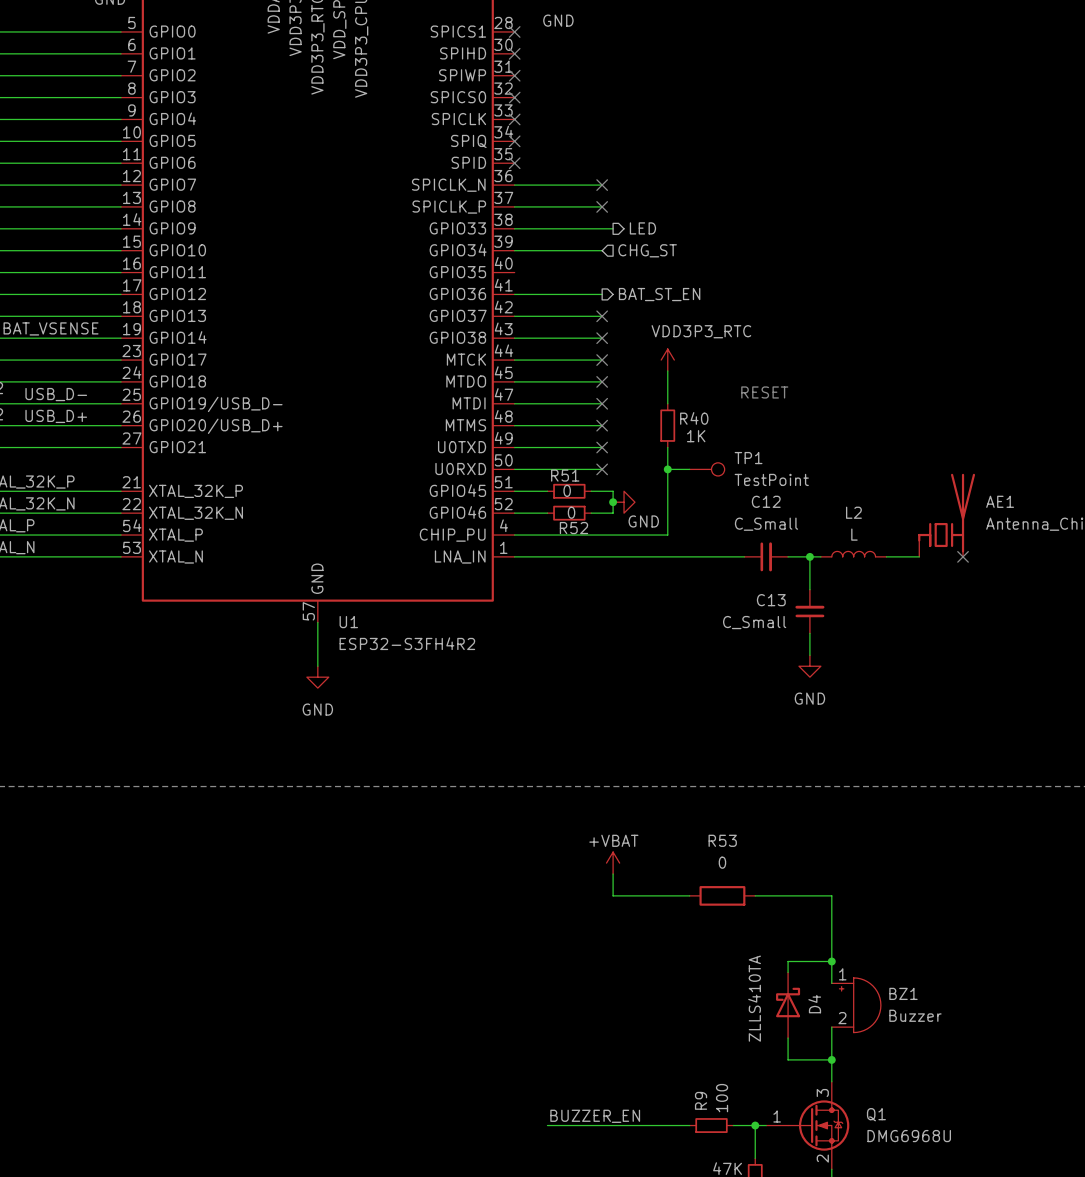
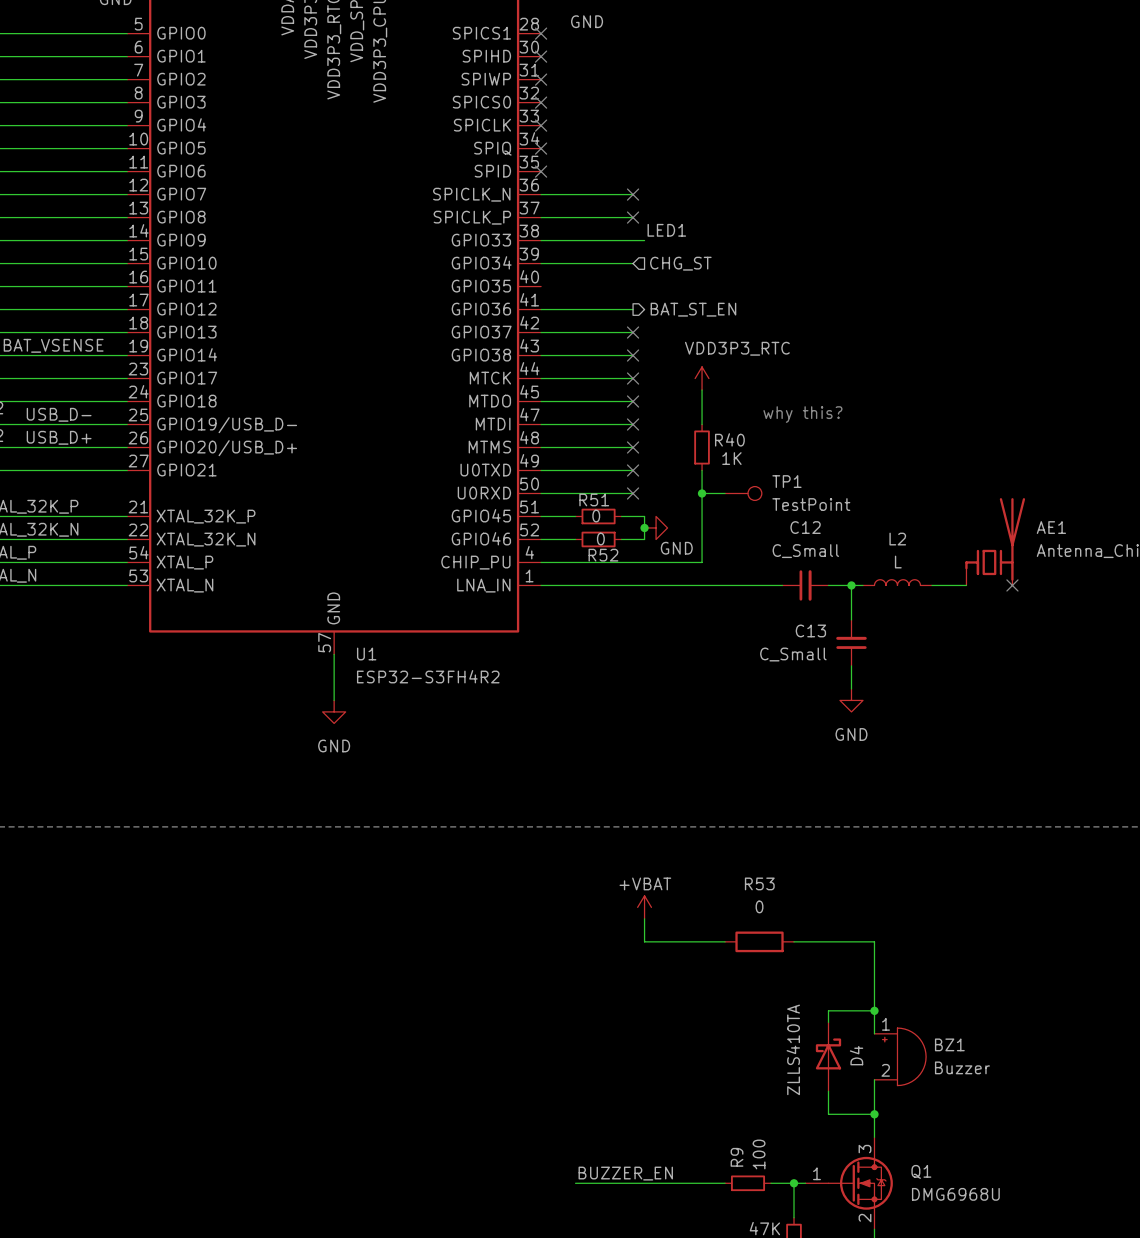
label: none -> LED1 (666, 230)
hierarchical label: LED (642, 228) -> none
text: RESET (764, 392) -> why this? (802, 414)

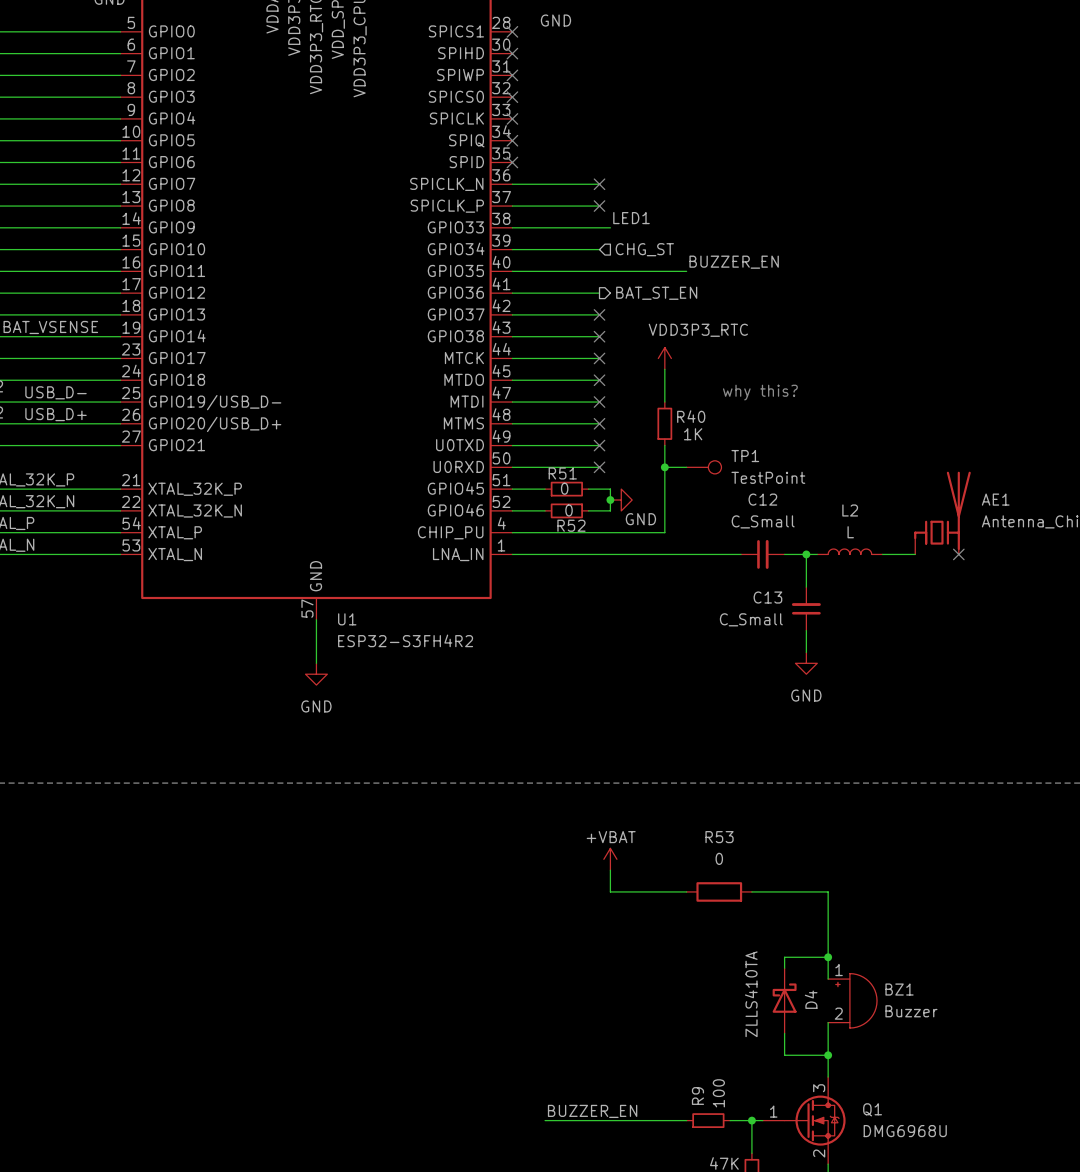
label: none -> BUZZER_EN (734, 262)
wire: none -> (512, 271) (686, 271)

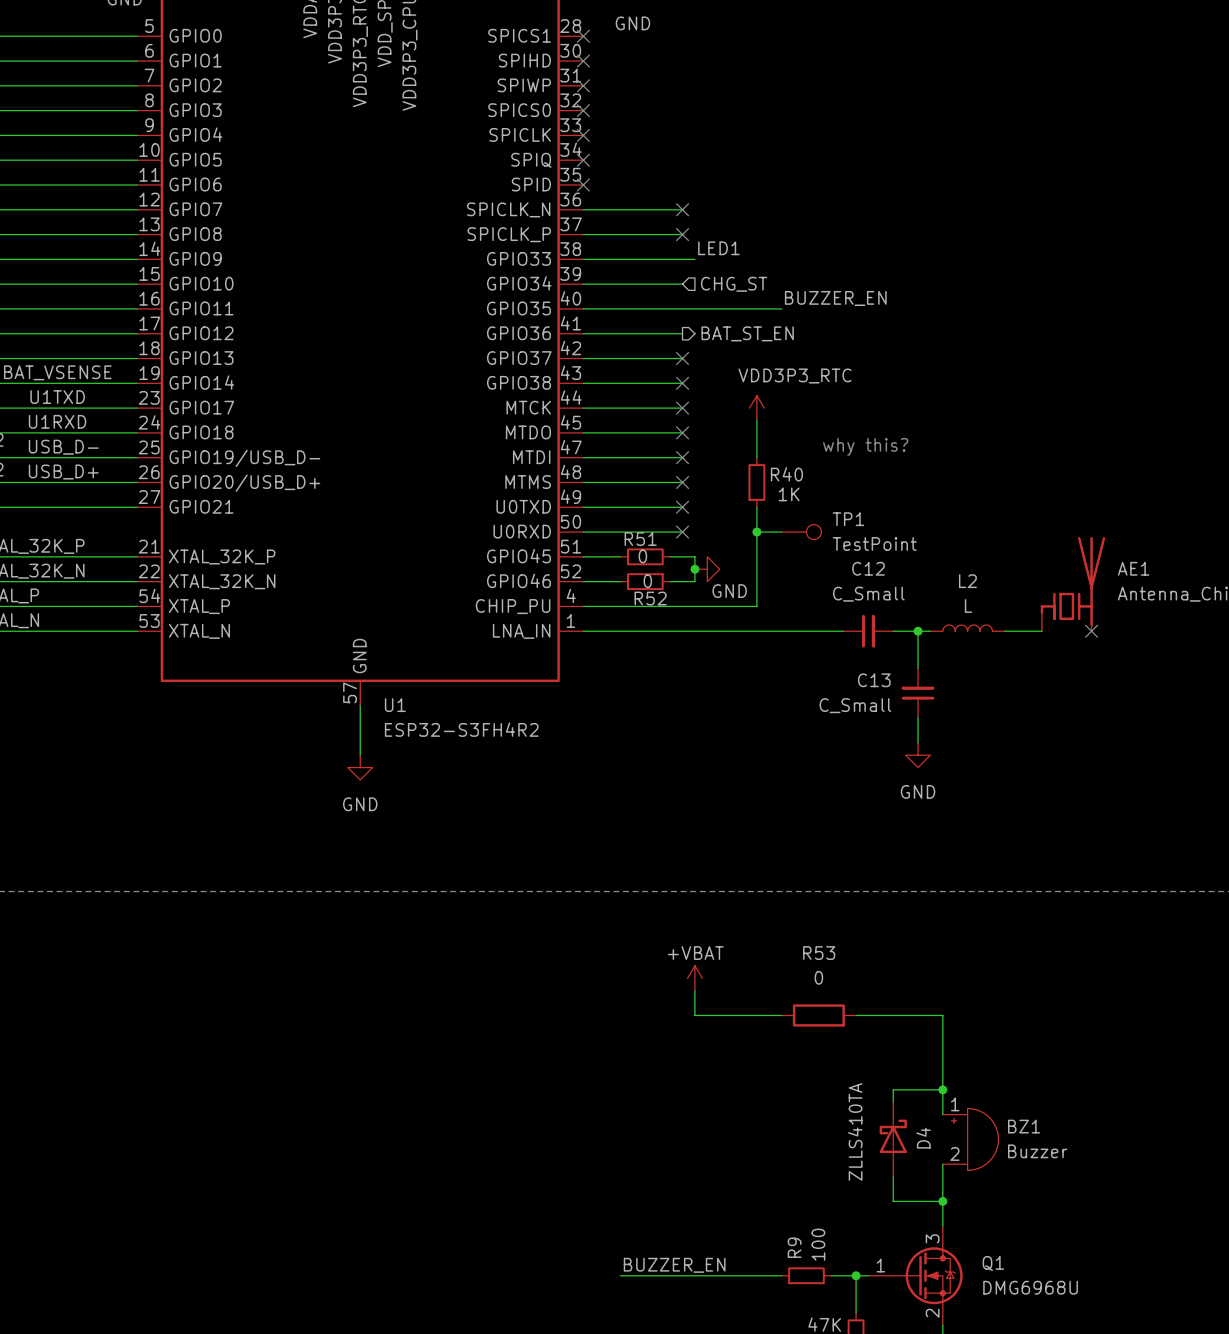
label: none -> U1TXD (57, 397)
label: none -> U1RXD (57, 421)

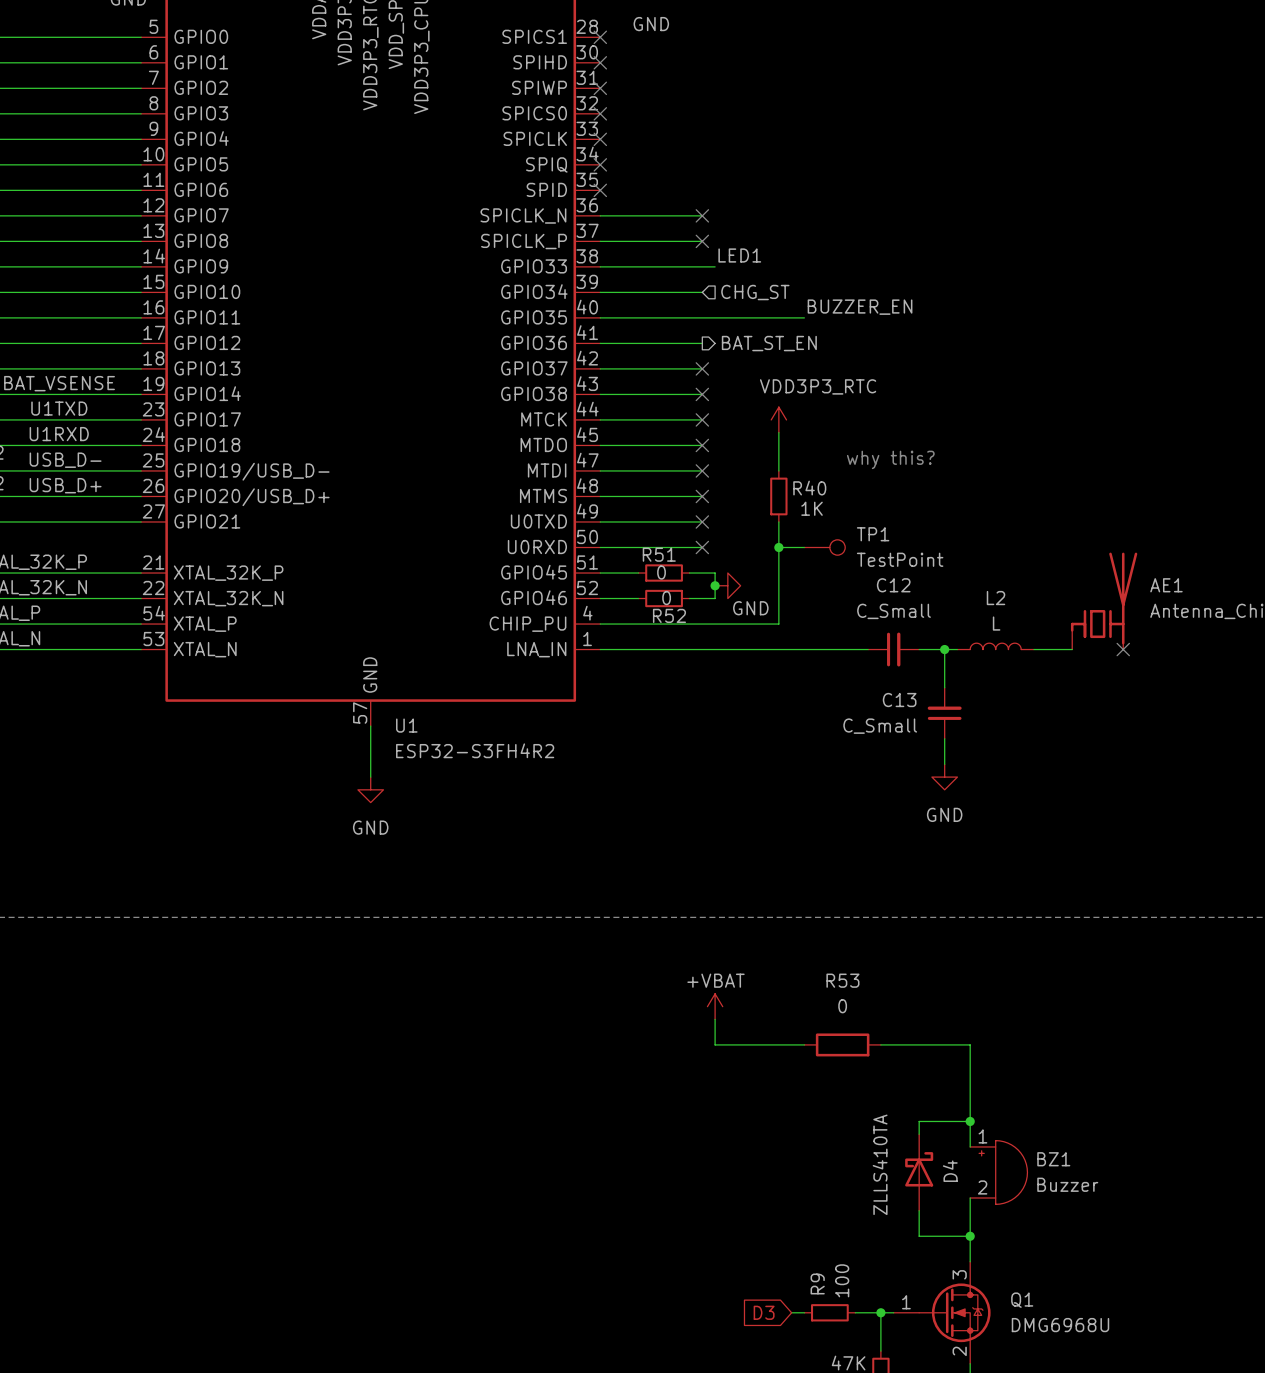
label: BUZZER_EN (674, 1265) -> none
wire: (620, 1275) (769, 1275) -> none
global label: none -> D3 (764, 1312)

